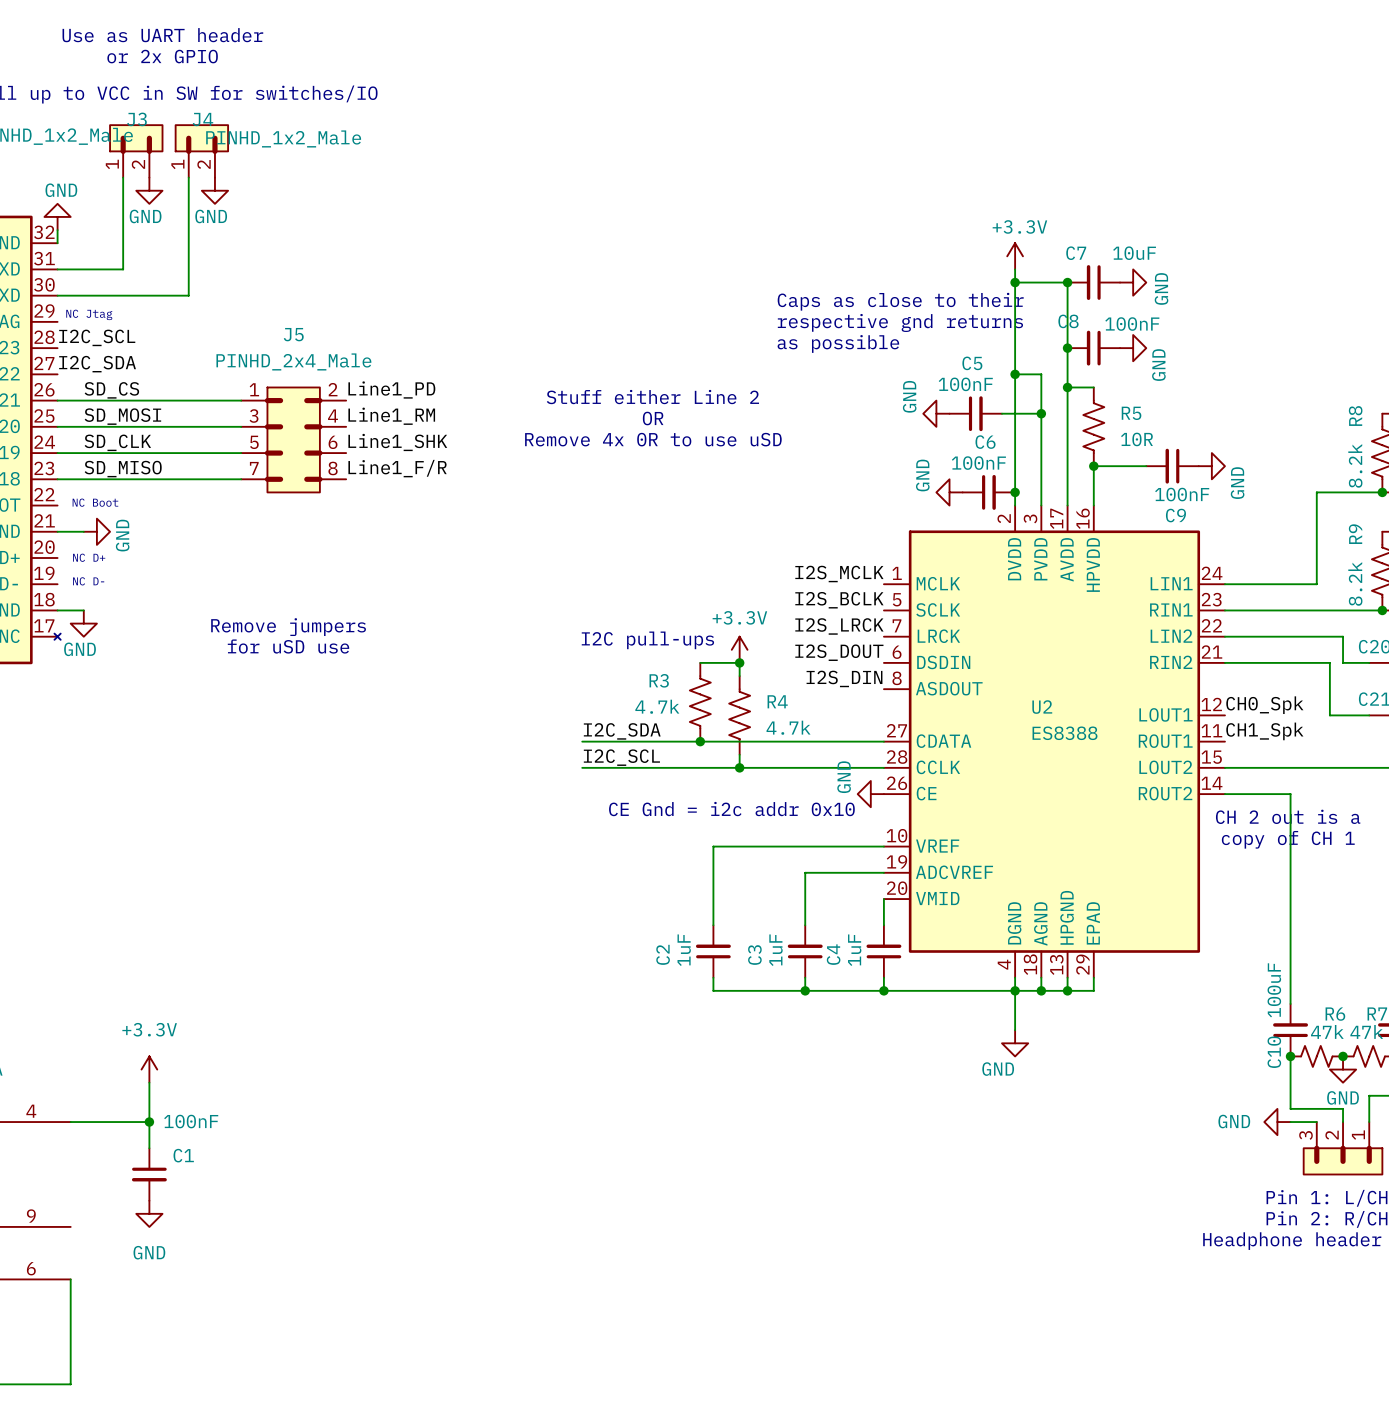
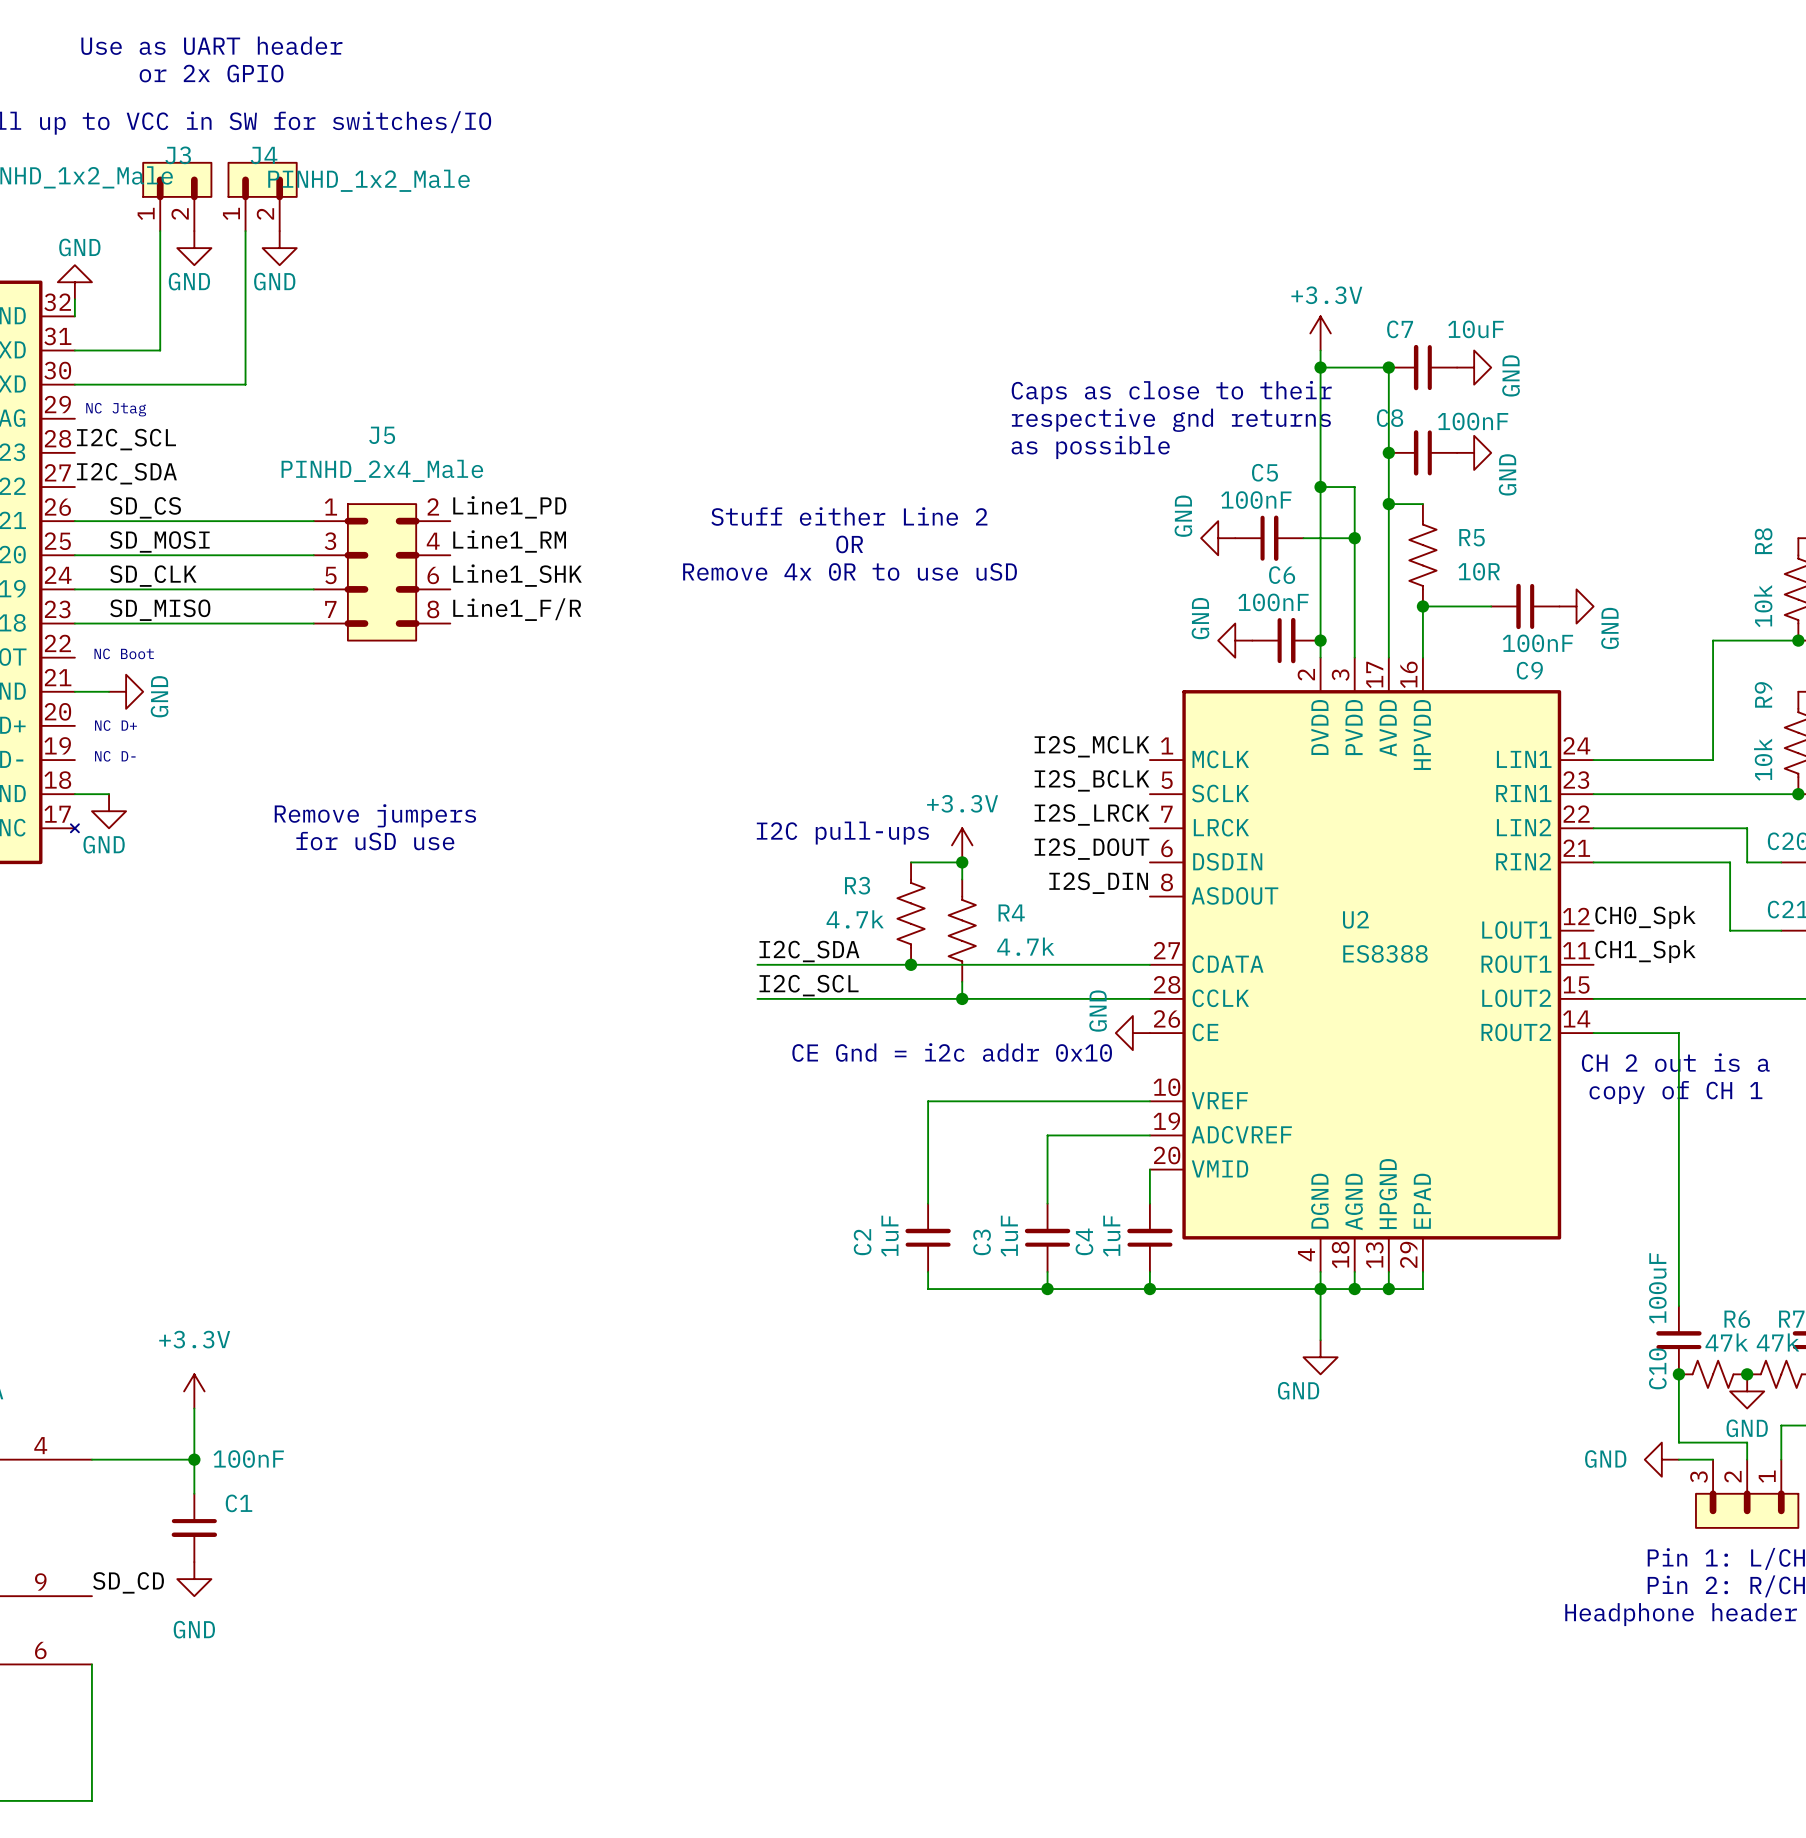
R8 value: 8.2k (1355, 465) -> 10k (1763, 606)
R9 value: 8.2k (1355, 583) -> 10k (1763, 759)
label: none -> SD_CD (128, 1582)

